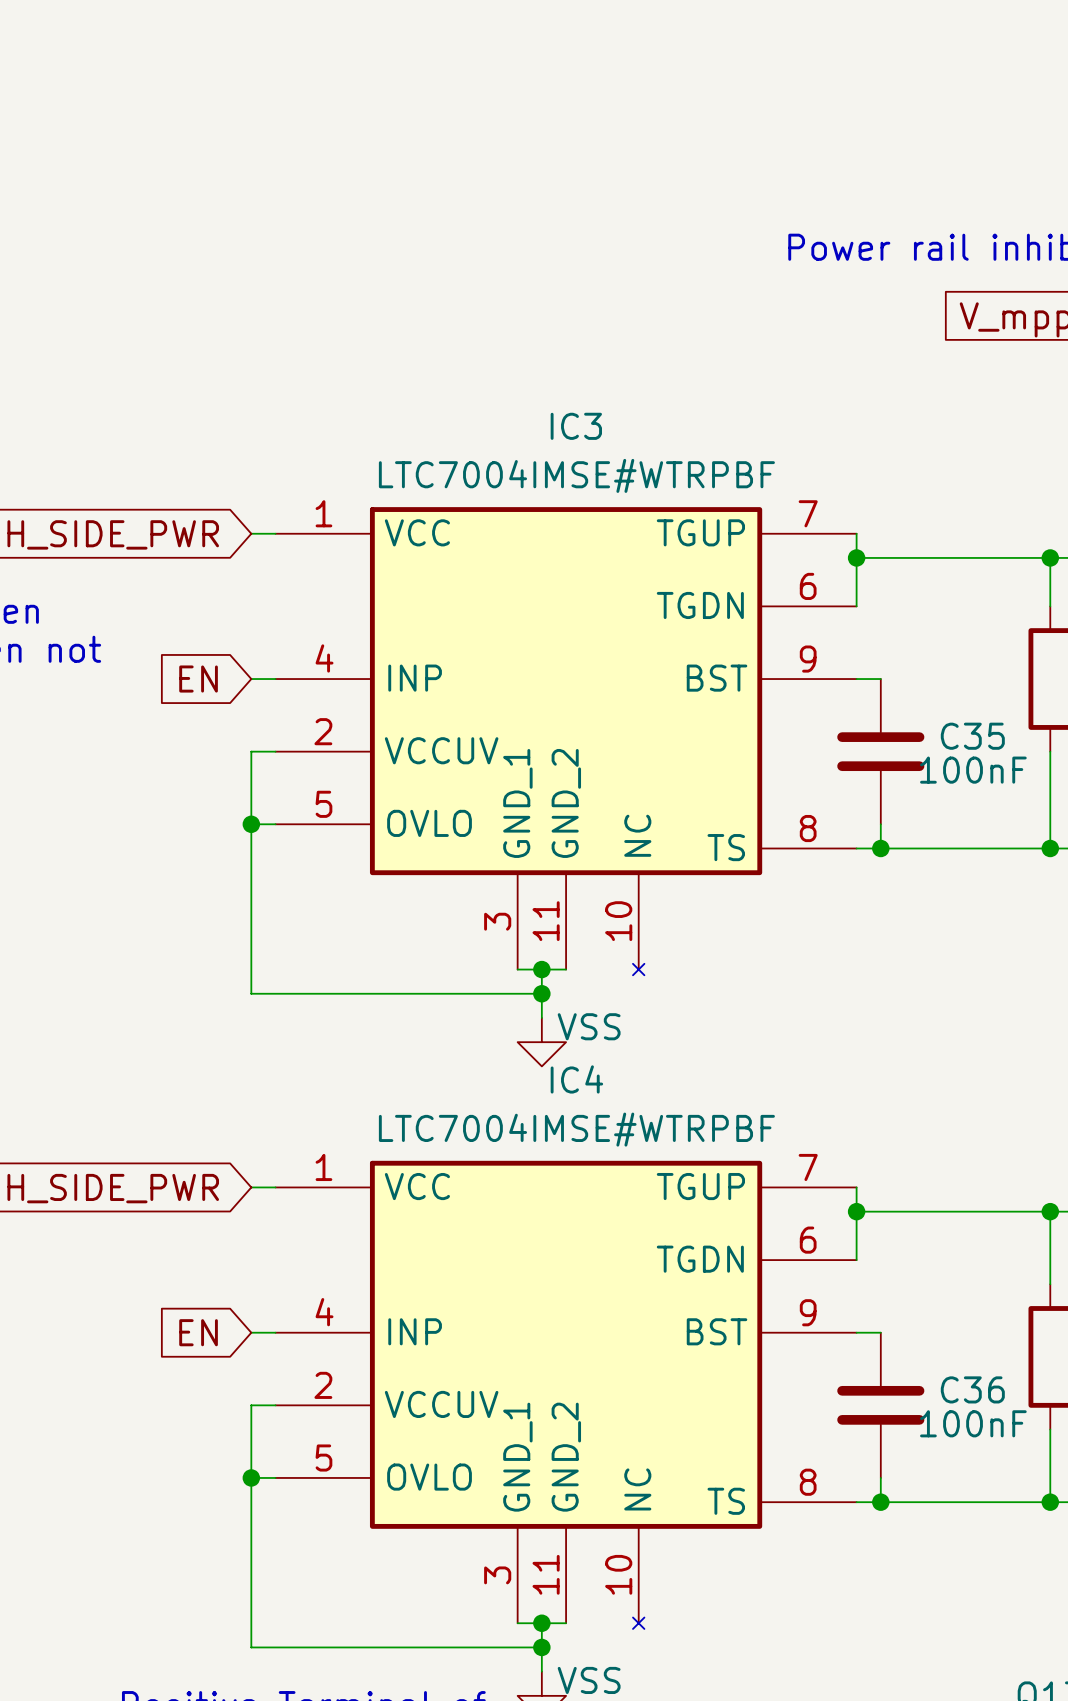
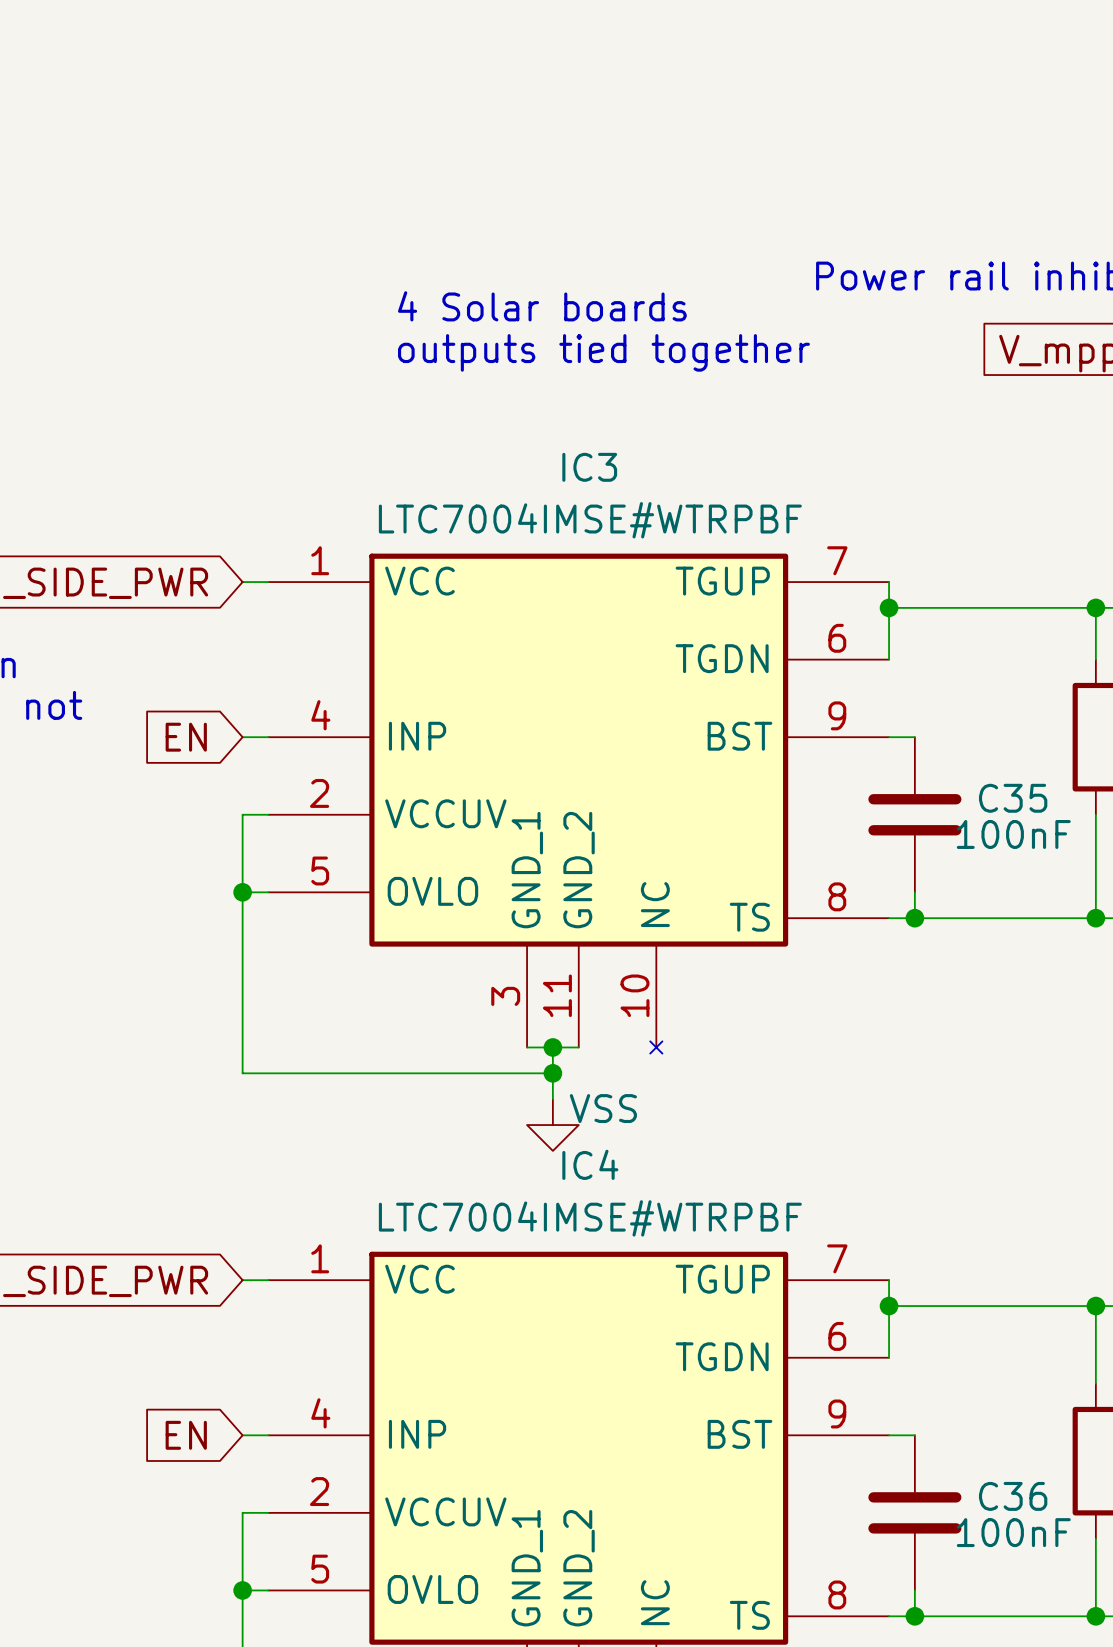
text: none -> 4 Solar boards (542, 306)
text: none -> outputs tied together (603, 352)

